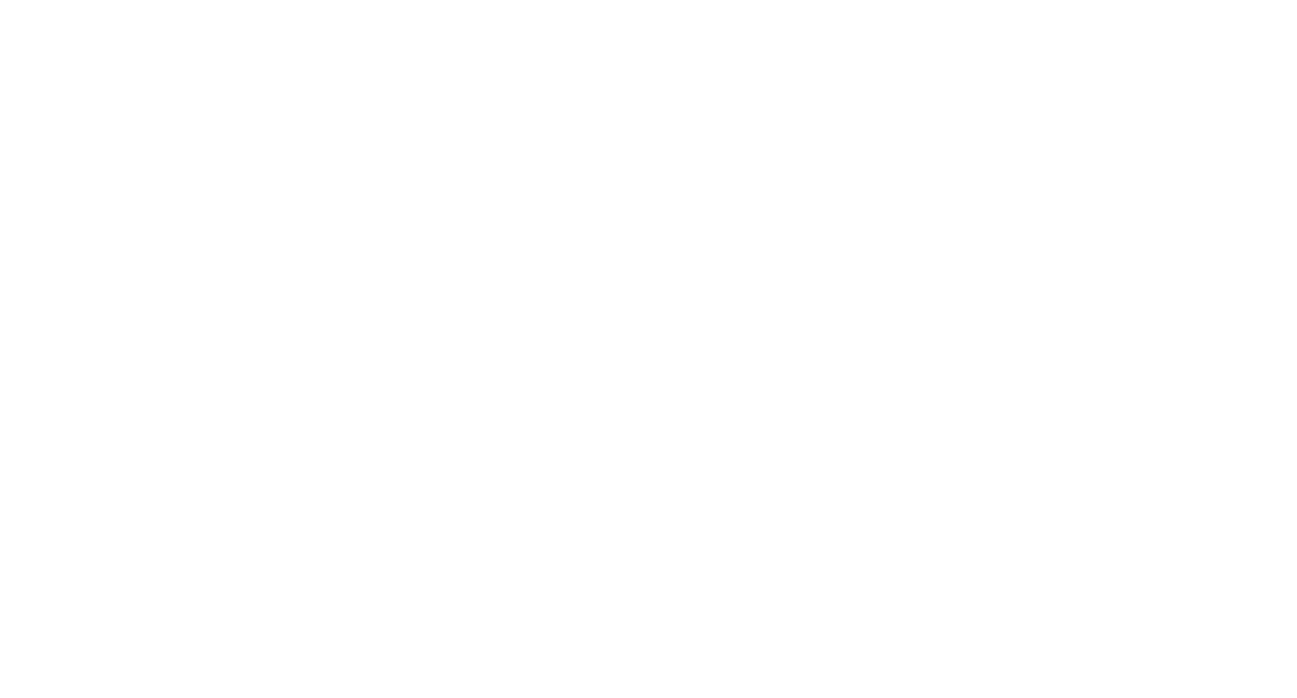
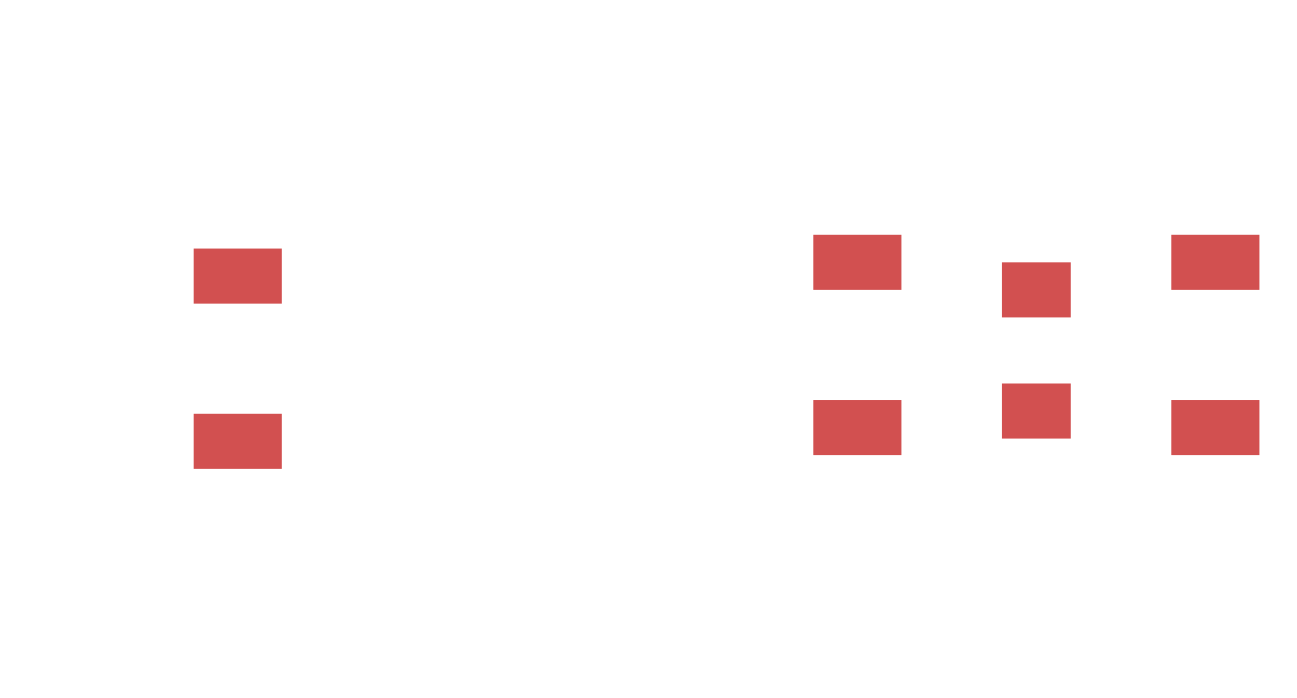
part: none -> (857, 344)
part: none -> (1215, 344)
part: none -> (1036, 350)
part: none -> (237, 358)

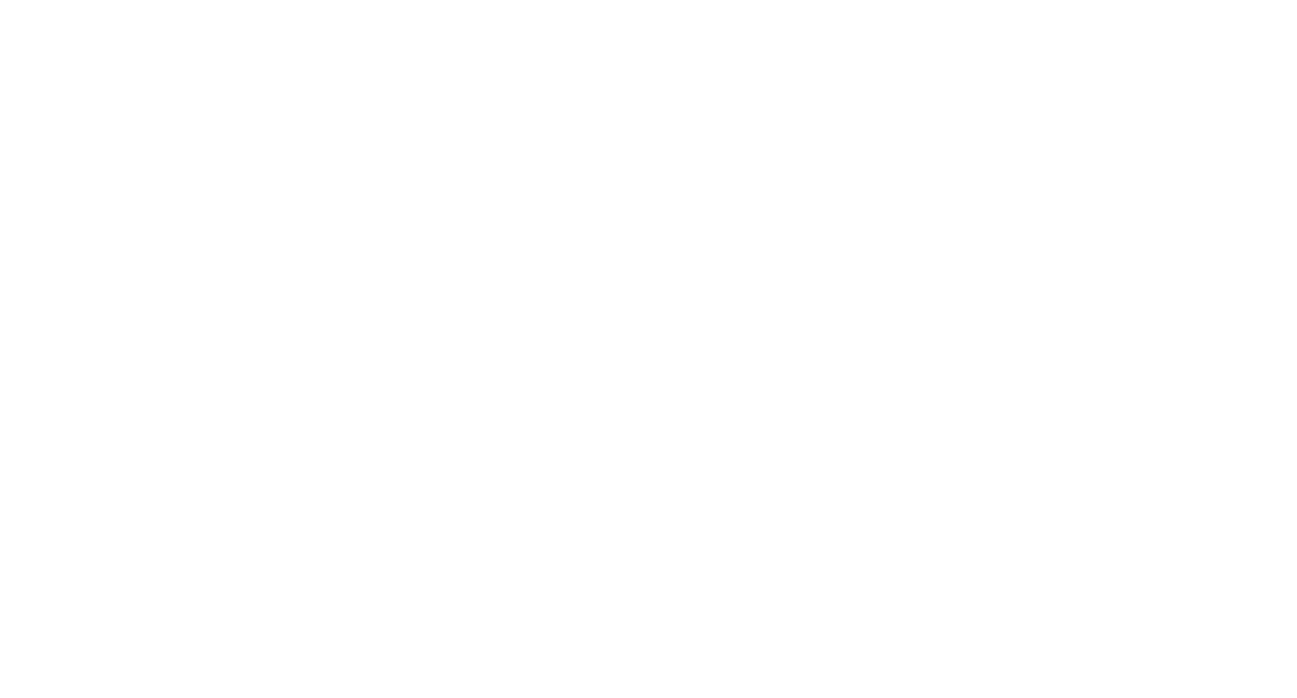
part: (857, 344) -> none
part: (1215, 344) -> none
part: (1036, 350) -> none
part: (237, 358) -> none

